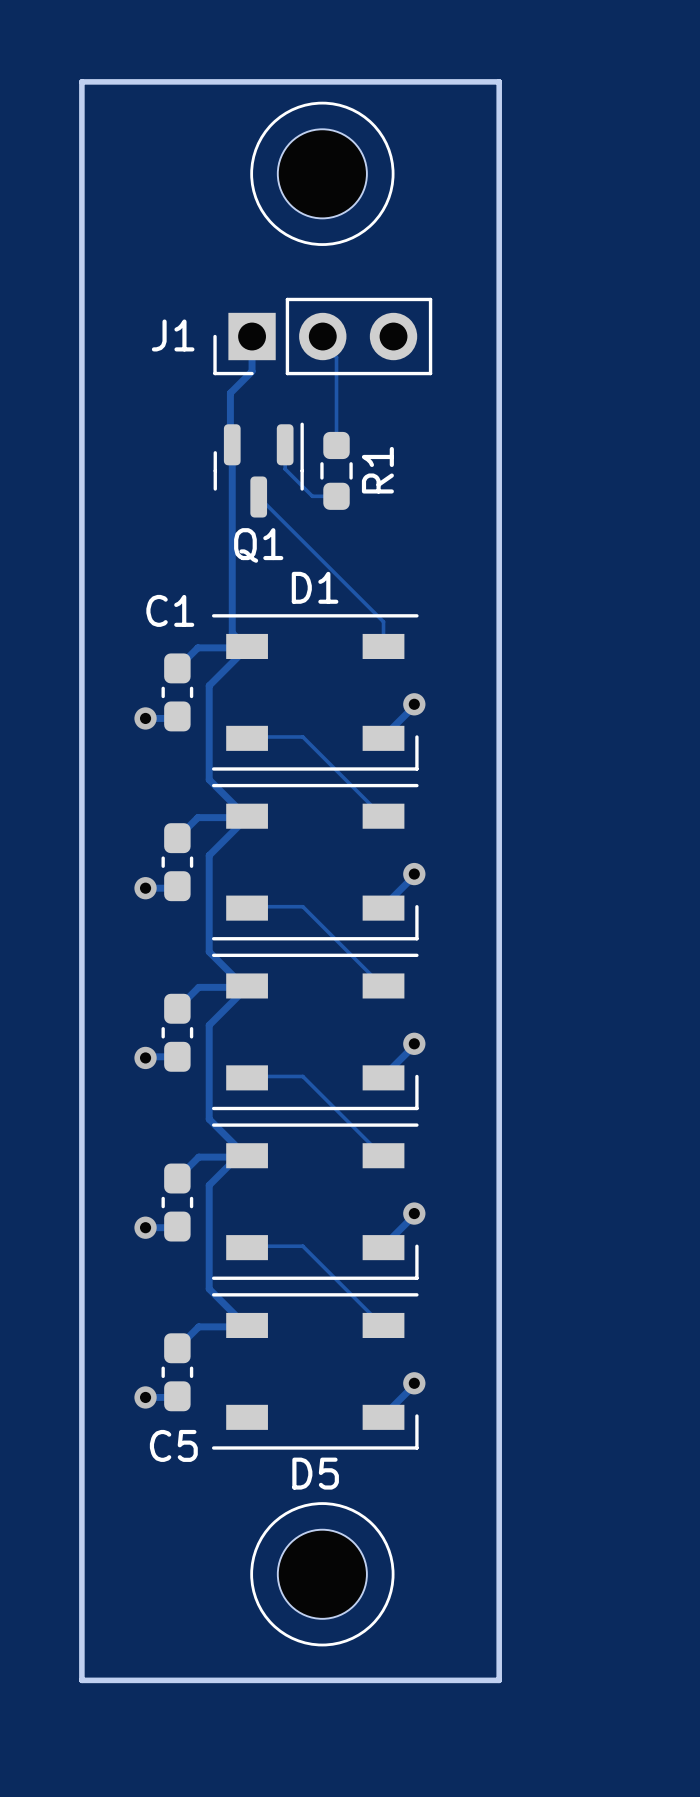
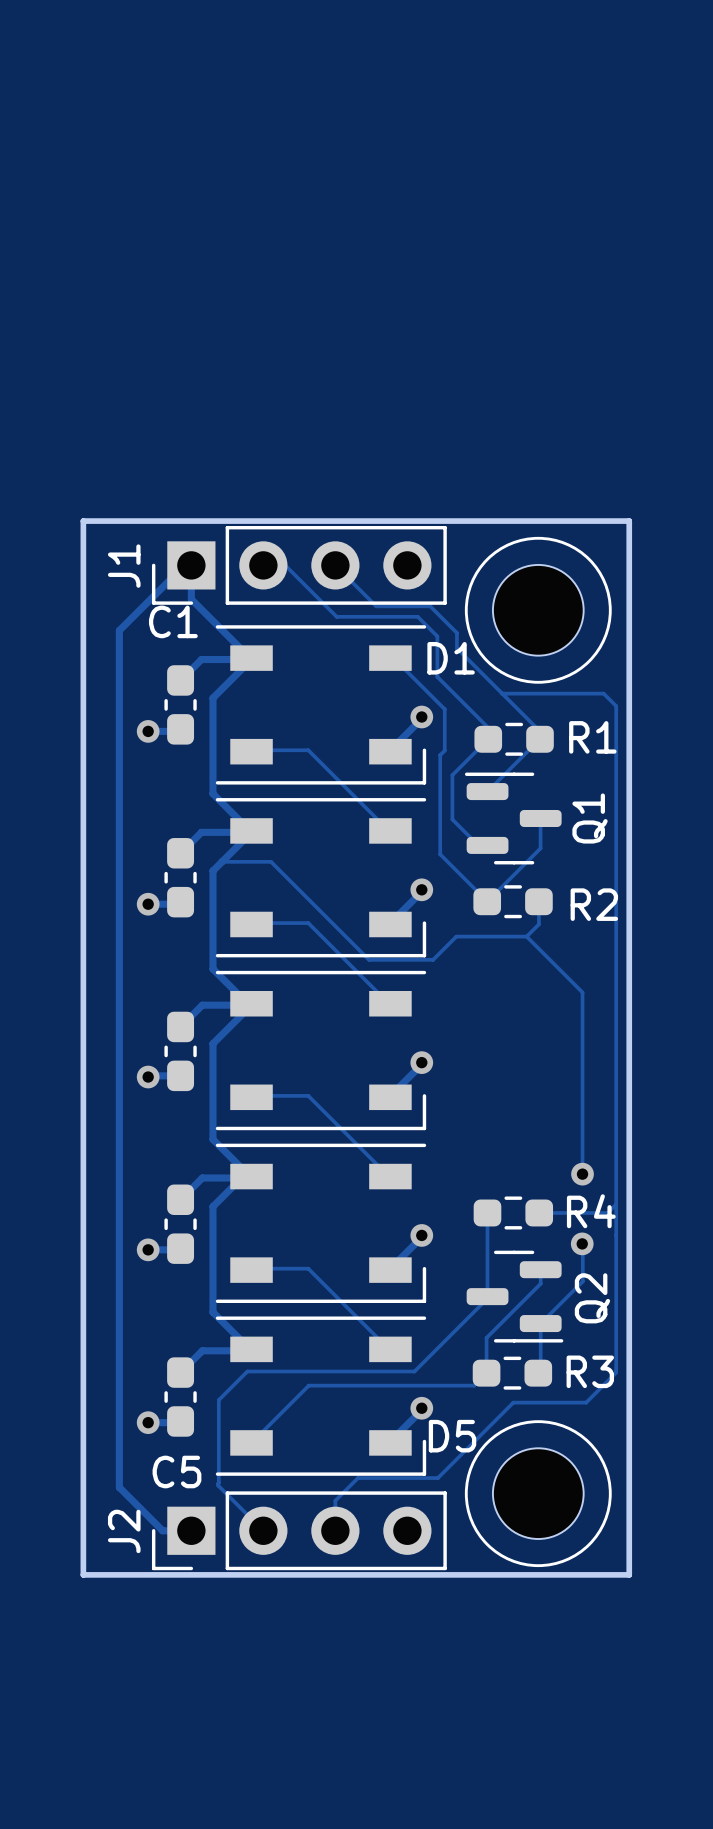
part position: (322, 173) -> (538, 610)
J1 footprint: [213, 297, 433, 376] -> [151, 525, 447, 605]
track: (252, 336) (252, 371) (230, 393) (232, 633) -> (191, 1530) (162, 1530) (119, 1487) (119, 630) (184, 565) (191, 565) (191, 599) (236, 644)
track: (315, 336) (336, 357) (336, 445) -> none
track: (285, 444) (285, 469) (312, 496) (336, 496) -> none
Q1 rotation: 0° (258, 470) -> 90° counterclockwise (513, 818)
Q1 position: (258, 470) -> (513, 818)
R1 rotation: 0° (336, 470) -> 90° clockwise (514, 739)
R1 position: (336, 470) -> (514, 739)
track: (258, 497) (383, 621) (383, 647) -> none
board edge: (81, 511) (81, 81) (499, 81) (499, 1680) (81, 1680) (81, 1546) -> (83, 521) (629, 521) (629, 1574) (83, 1574)
track: none -> (285, 565) (336, 616) (417, 616) (437, 636) (437, 676) (488, 727) (488, 739) (452, 775) (452, 819) (478, 845) (487, 845)
track: none -> (335, 565) (376, 606) (430, 606) (456, 632) (456, 648) (540, 731) (540, 739)
D1 name position: D1 (315, 587) -> D1 (451, 658)
track: none -> (390, 658) (393, 658) (444, 709) (444, 750) (440, 755) (440, 854) (487, 901)
track: none -> (502, 693) (603, 693) (616, 706) (616, 1372) (586, 1402) (513, 1402) (437, 1478) (358, 1478) (335, 1500) (335, 1530)
track: none -> (539, 739) (487, 791)
track: none -> (540, 818) (540, 848) (487, 901)
track: none -> (222, 861) (271, 861) (369, 959) (433, 959) (456, 936) (526, 936)
R2: none -> (513, 901)
track: none -> (538, 901) (538, 924) (526, 936)
track: none -> (526, 936) (582, 992) (582, 1174)
via: none -> (582, 1174)
track: none -> (616, 1204) (607, 1212) (539, 1212)
track: none -> (487, 1212) (487, 1298) (414, 1371) (247, 1371) (218, 1400) (218, 1485) (263, 1530)
R4: none -> (513, 1212)
track: none -> (582, 1239) (582, 1281) (540, 1323) (540, 1370) (538, 1373)
via: none -> (582, 1243)
track: none -> (540, 1269) (540, 1283) (486, 1337) (486, 1373) (474, 1385) (308, 1385) (251, 1442)
Q2: none -> (514, 1296)
R3: none -> (512, 1373)
D5 name position: D5 (315, 1473) -> D5 (452, 1436)
J2: none -> (299, 1530)
part position: (322, 1574) -> (538, 1493)

